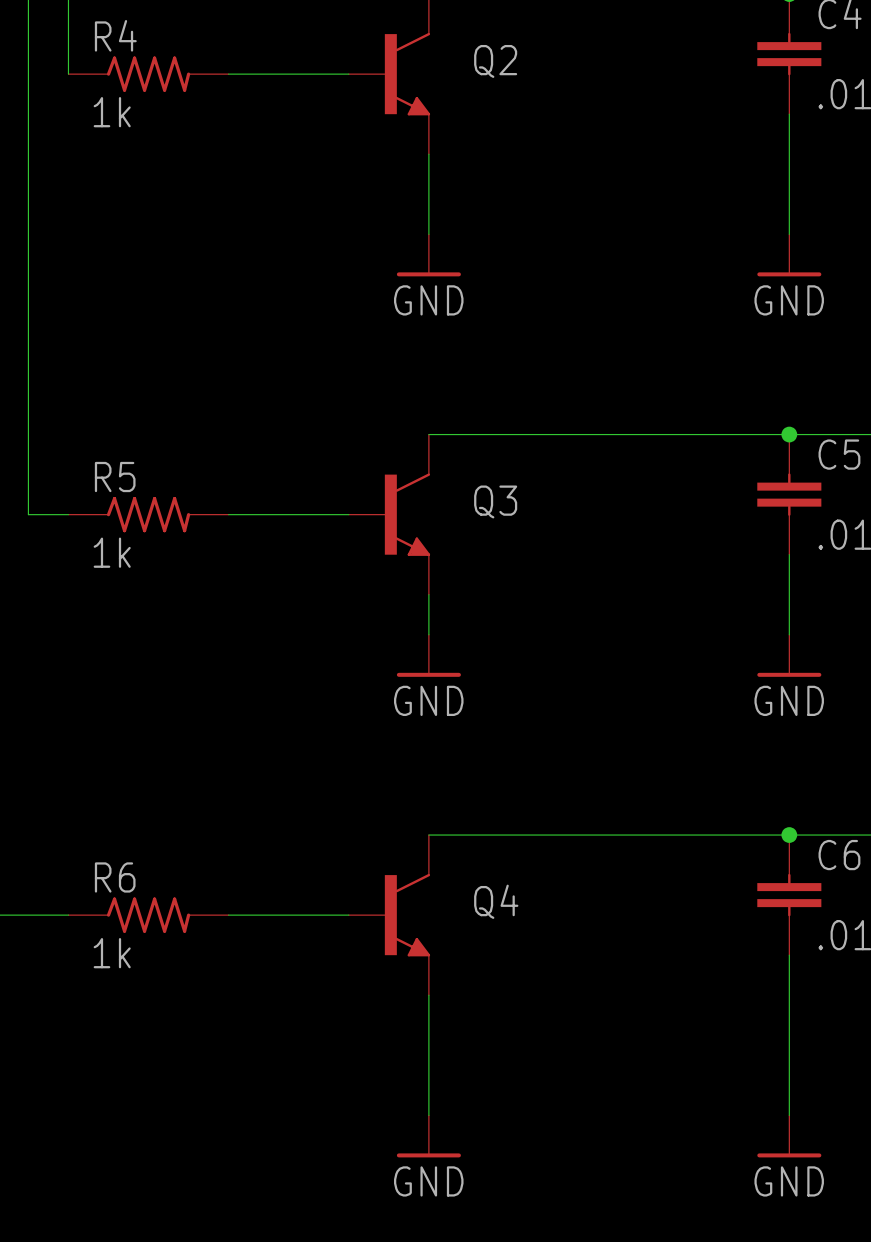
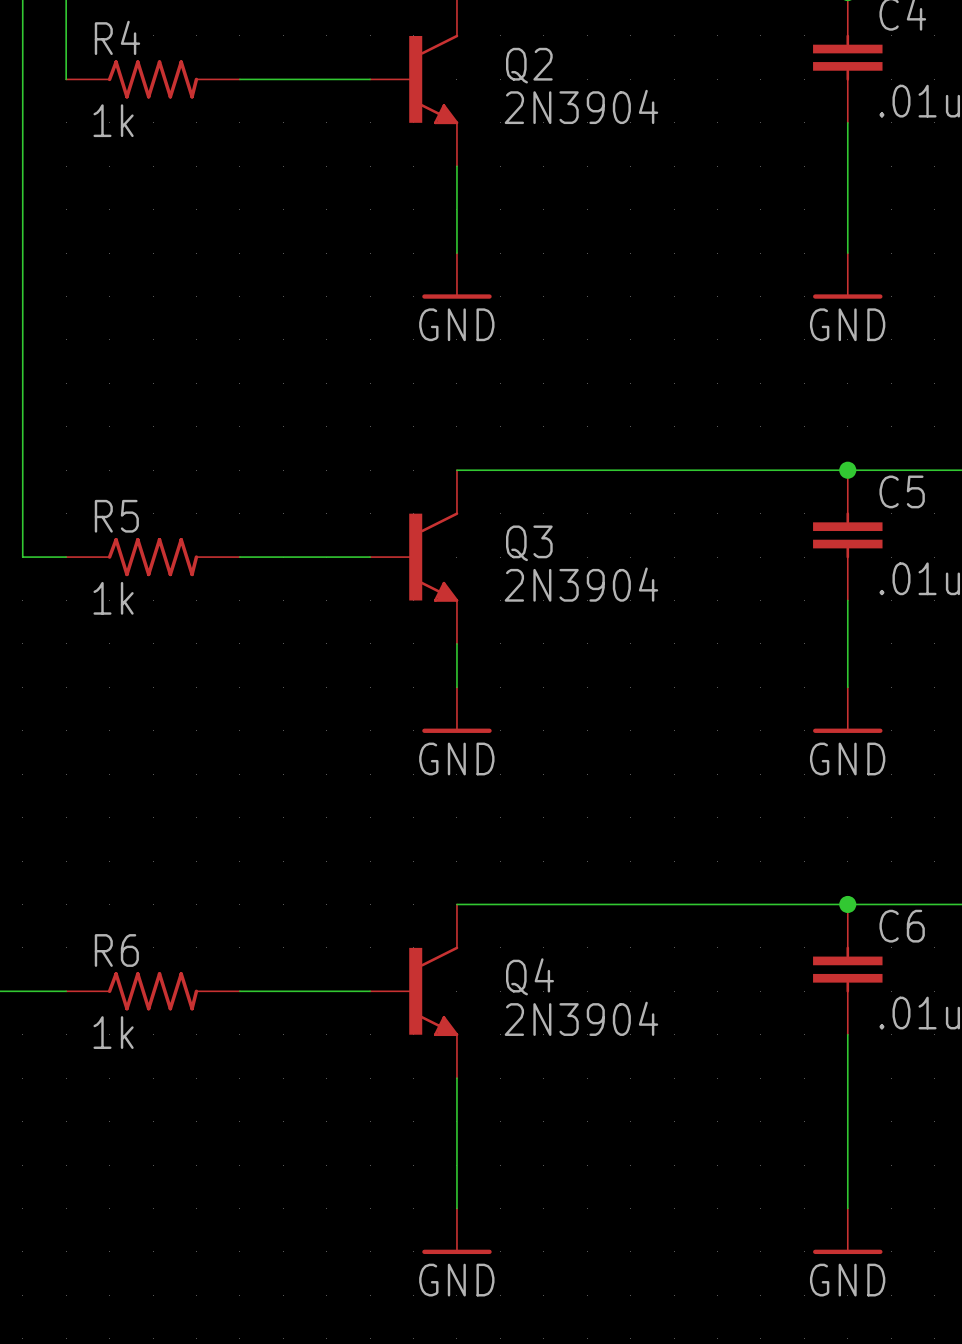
Q2 value: none -> 2N3904 (581, 106)
Q3 value: none -> 2N3904 (581, 584)
Q4 value: none -> 2N3904 (581, 1018)

